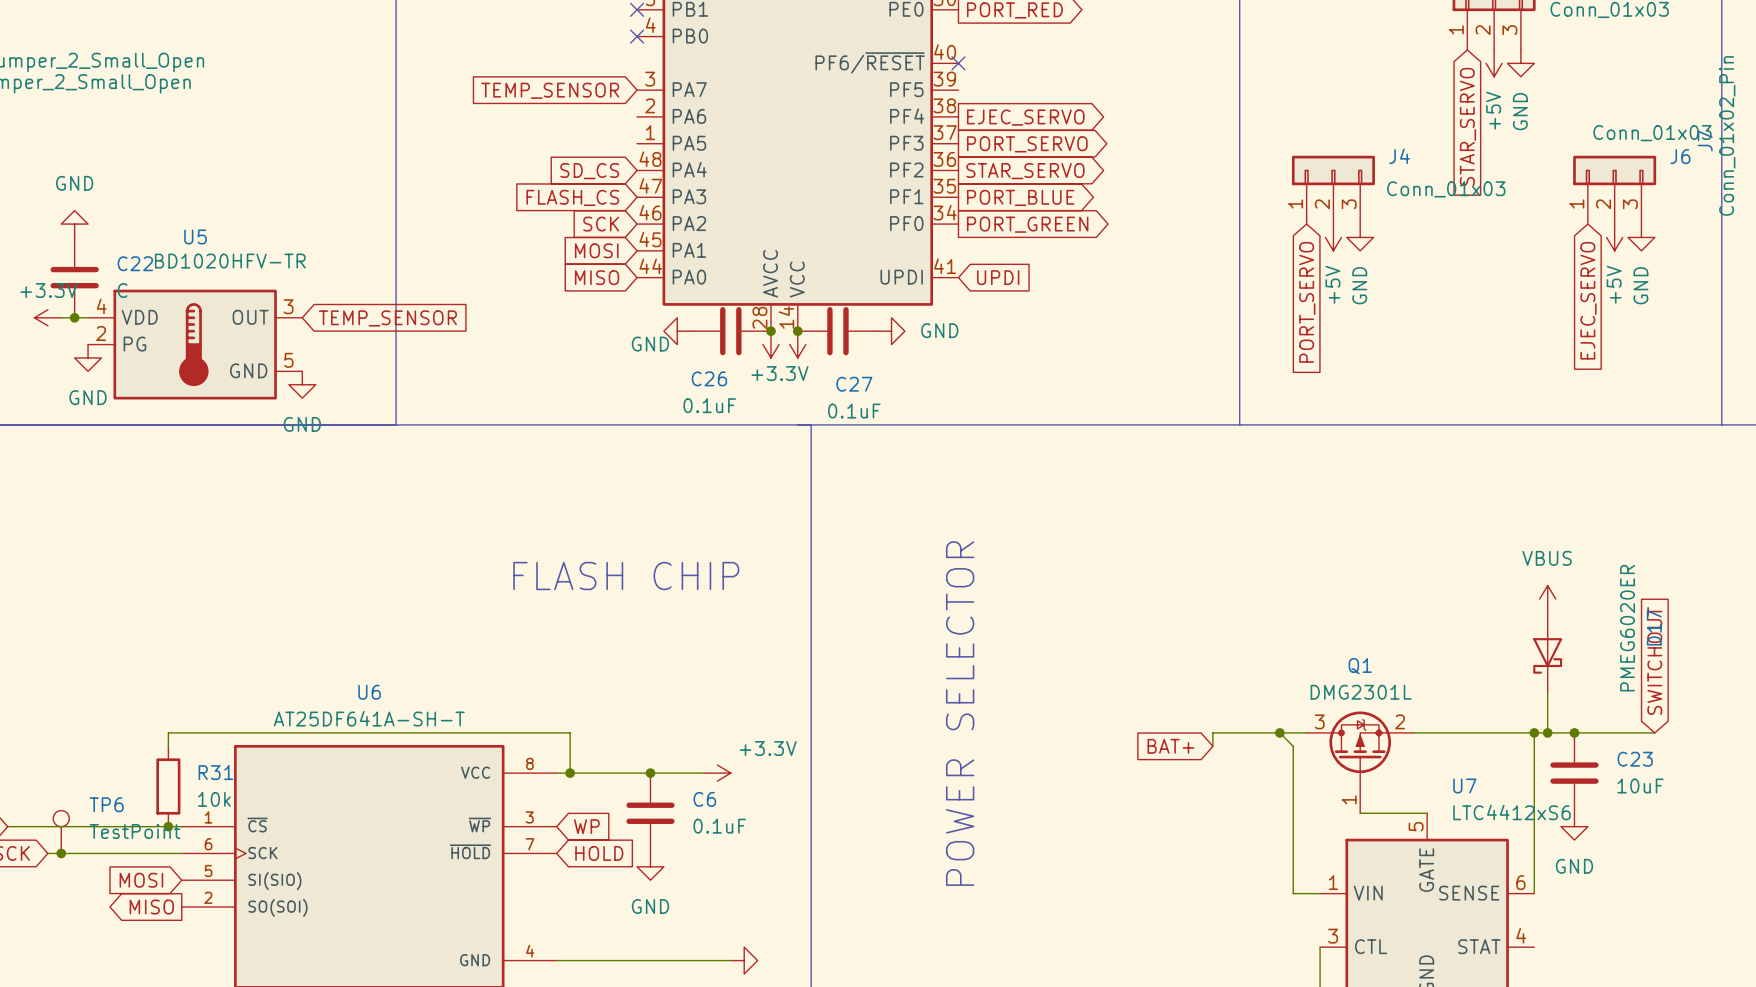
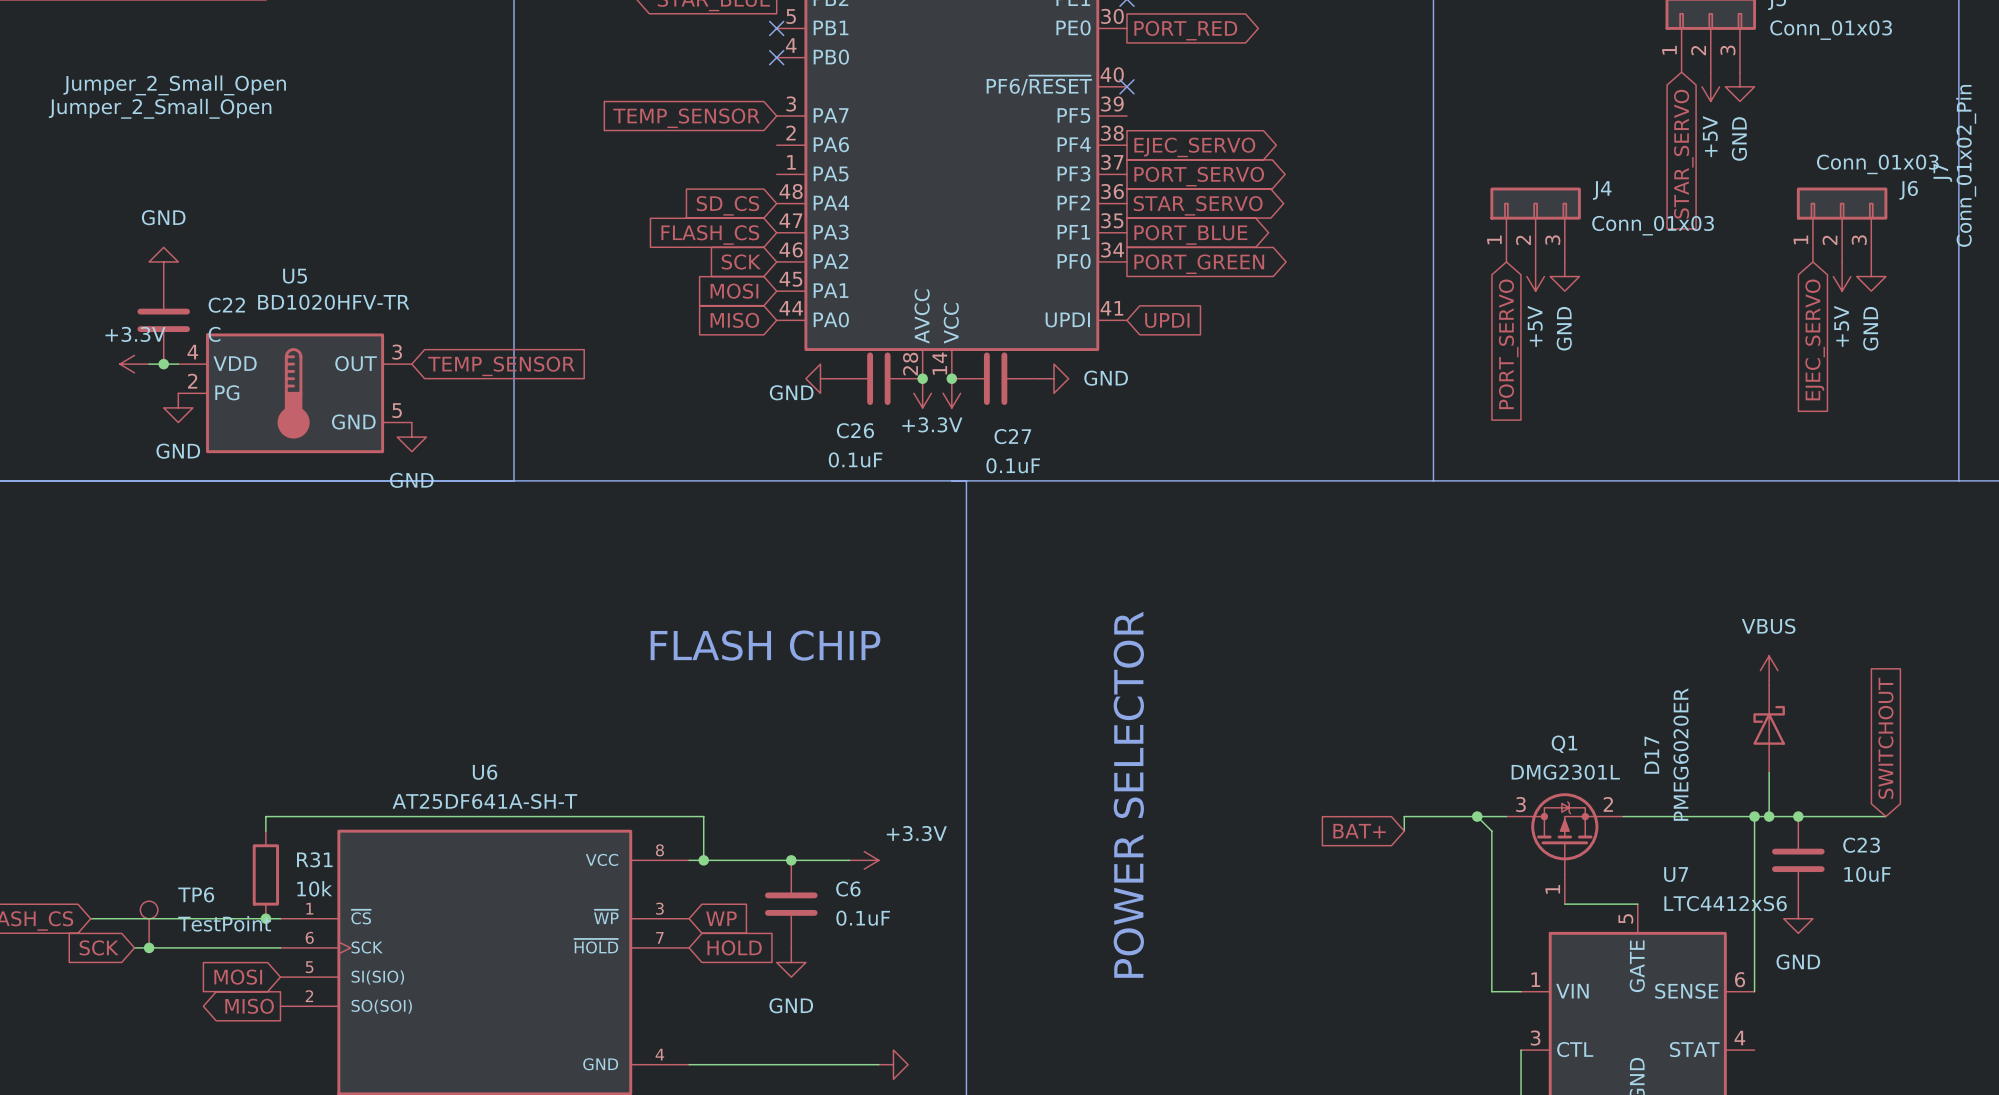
D17 rotation: 0° (1547, 655) -> 180° (1769, 725)

